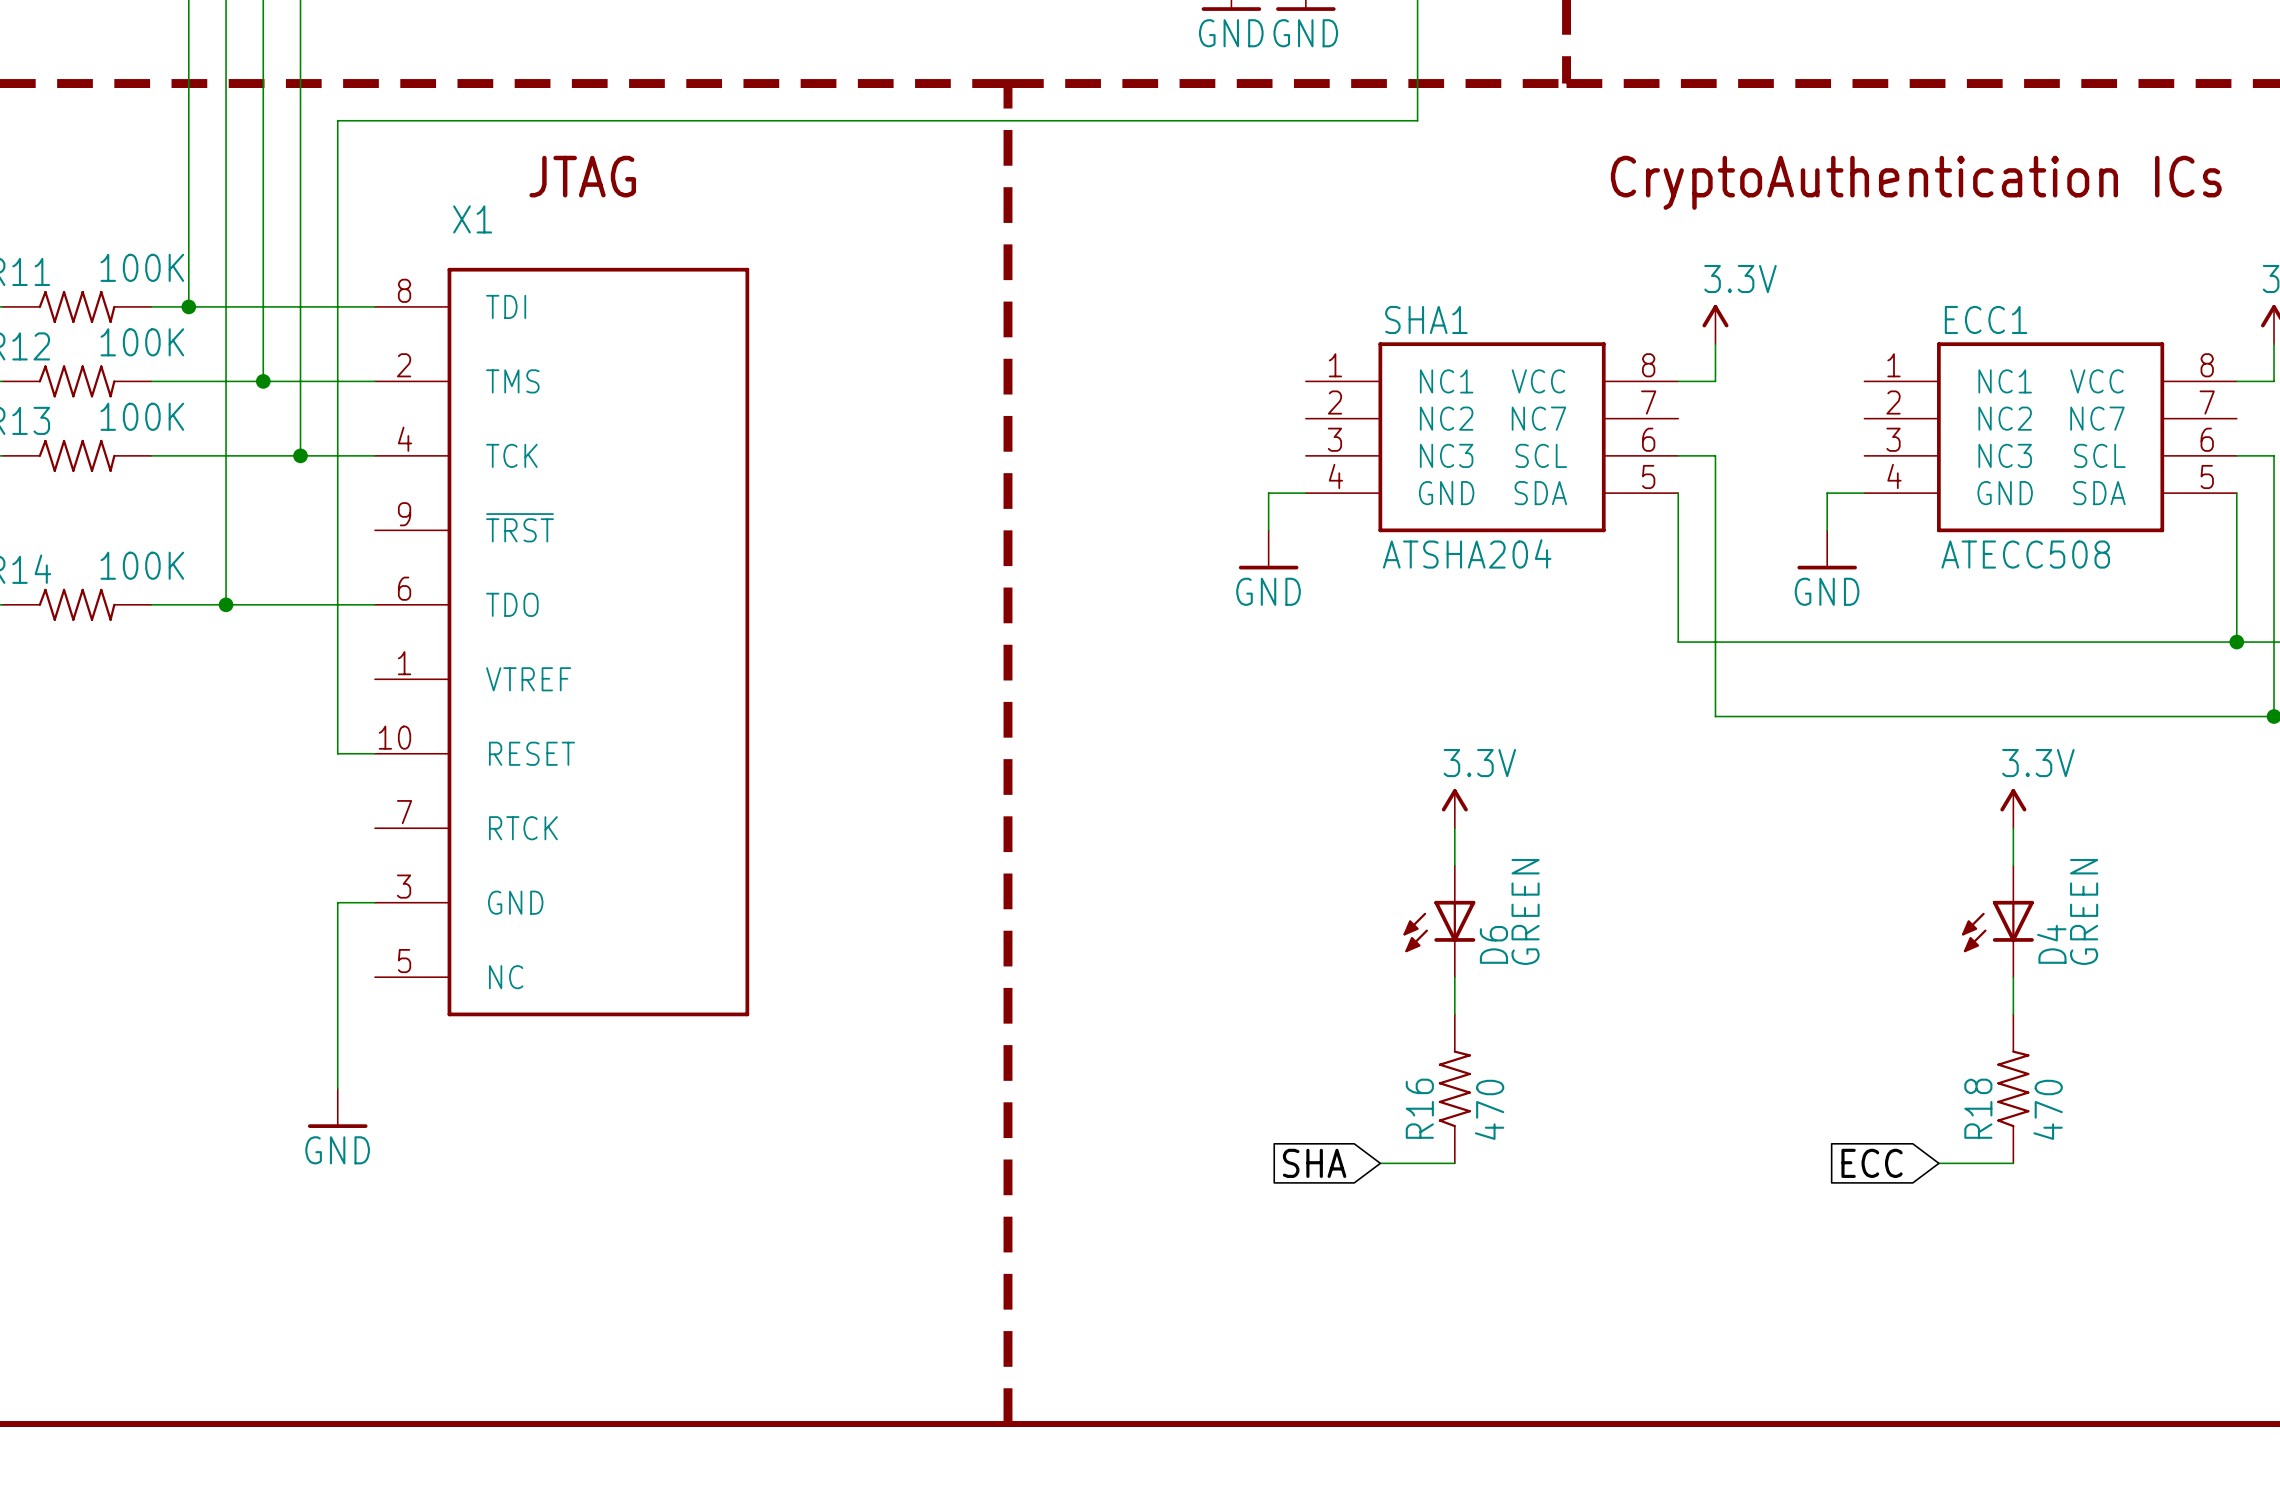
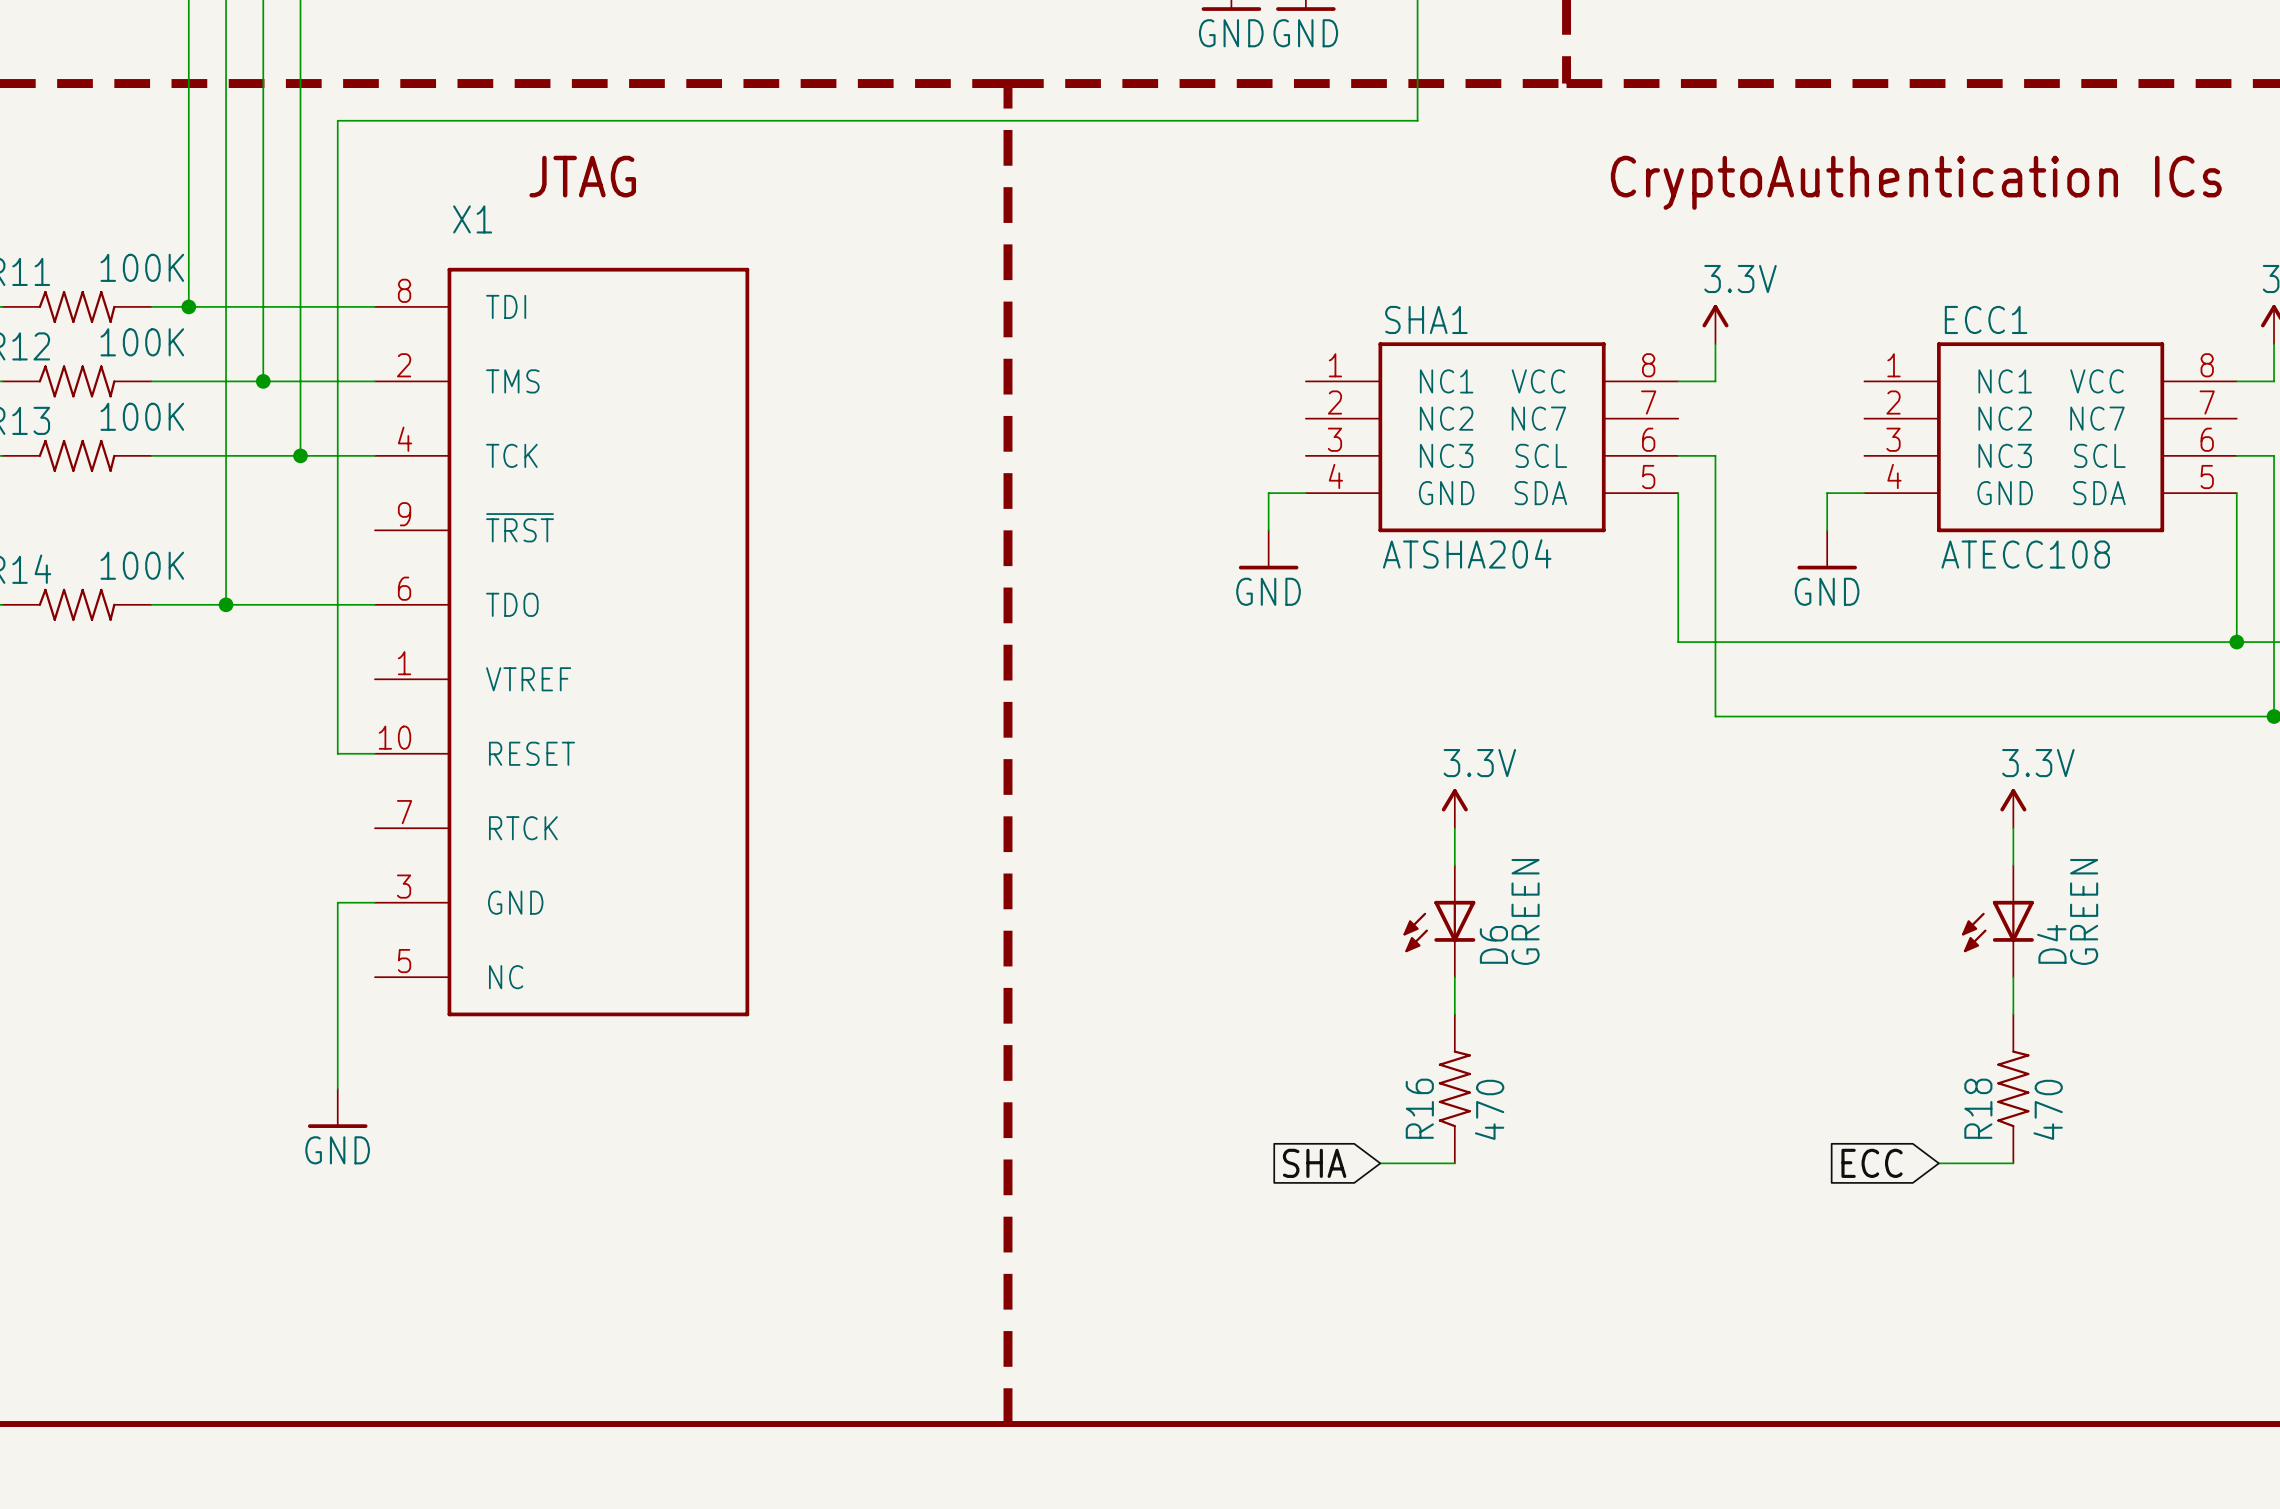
ECC1 value: ATECC508 (2025, 554) -> ATECC108 (2025, 554)

